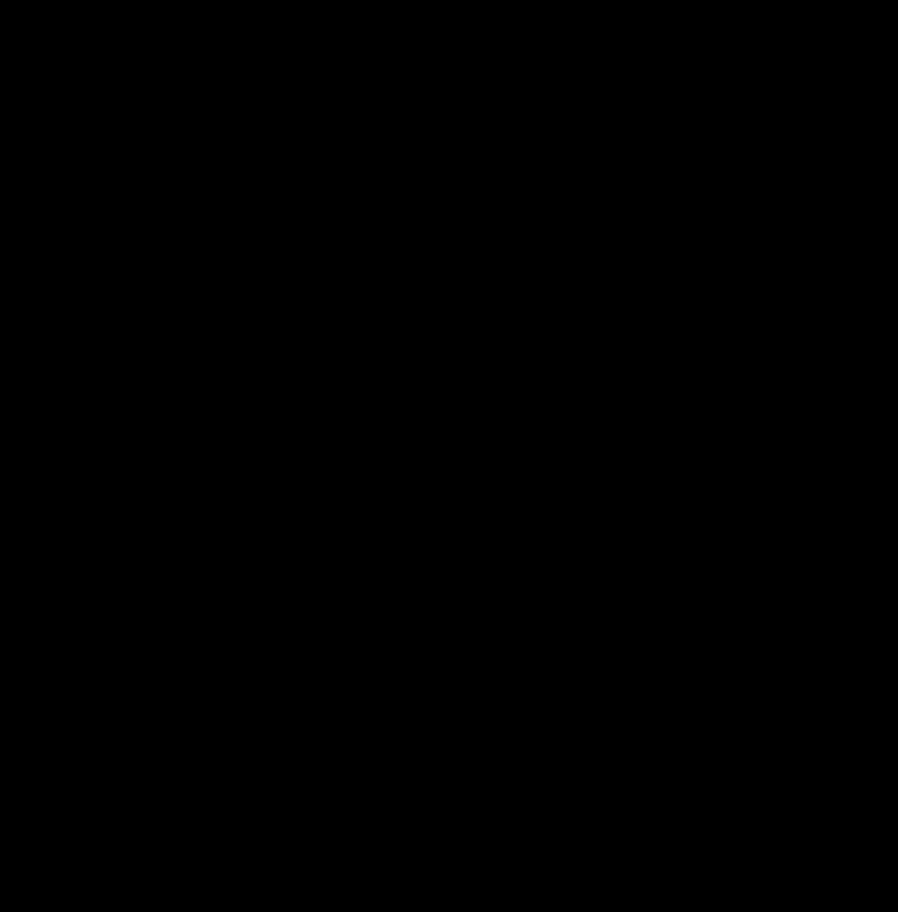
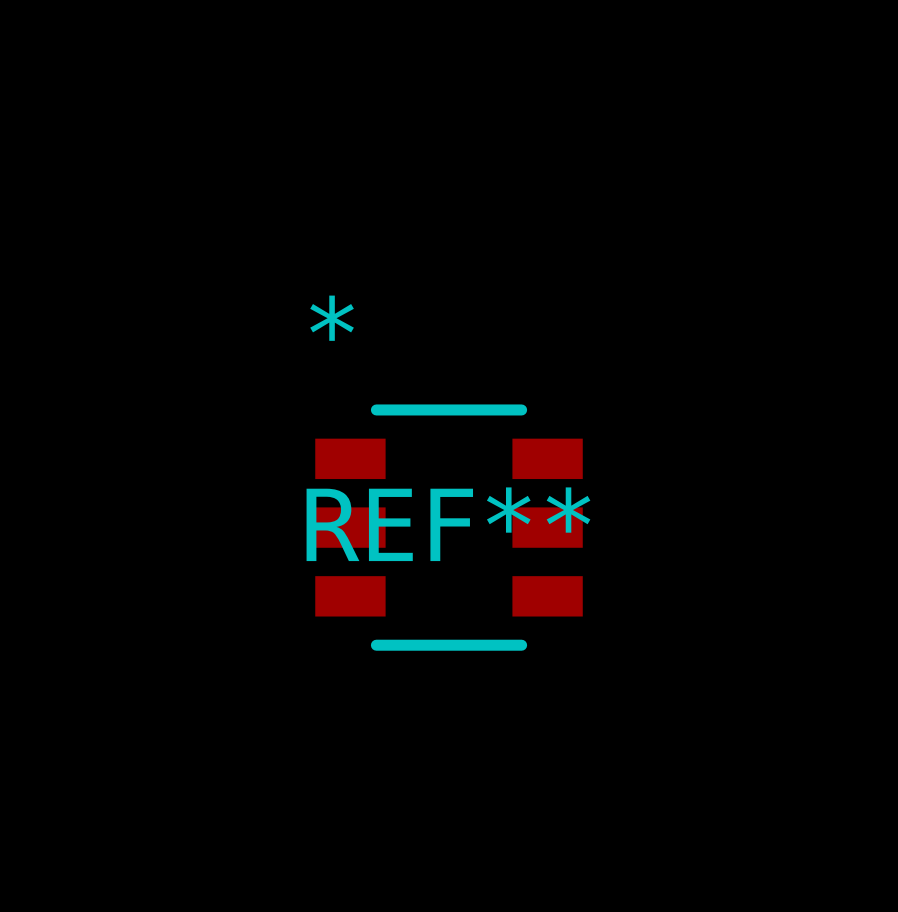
REF**: none -> (449, 527)

